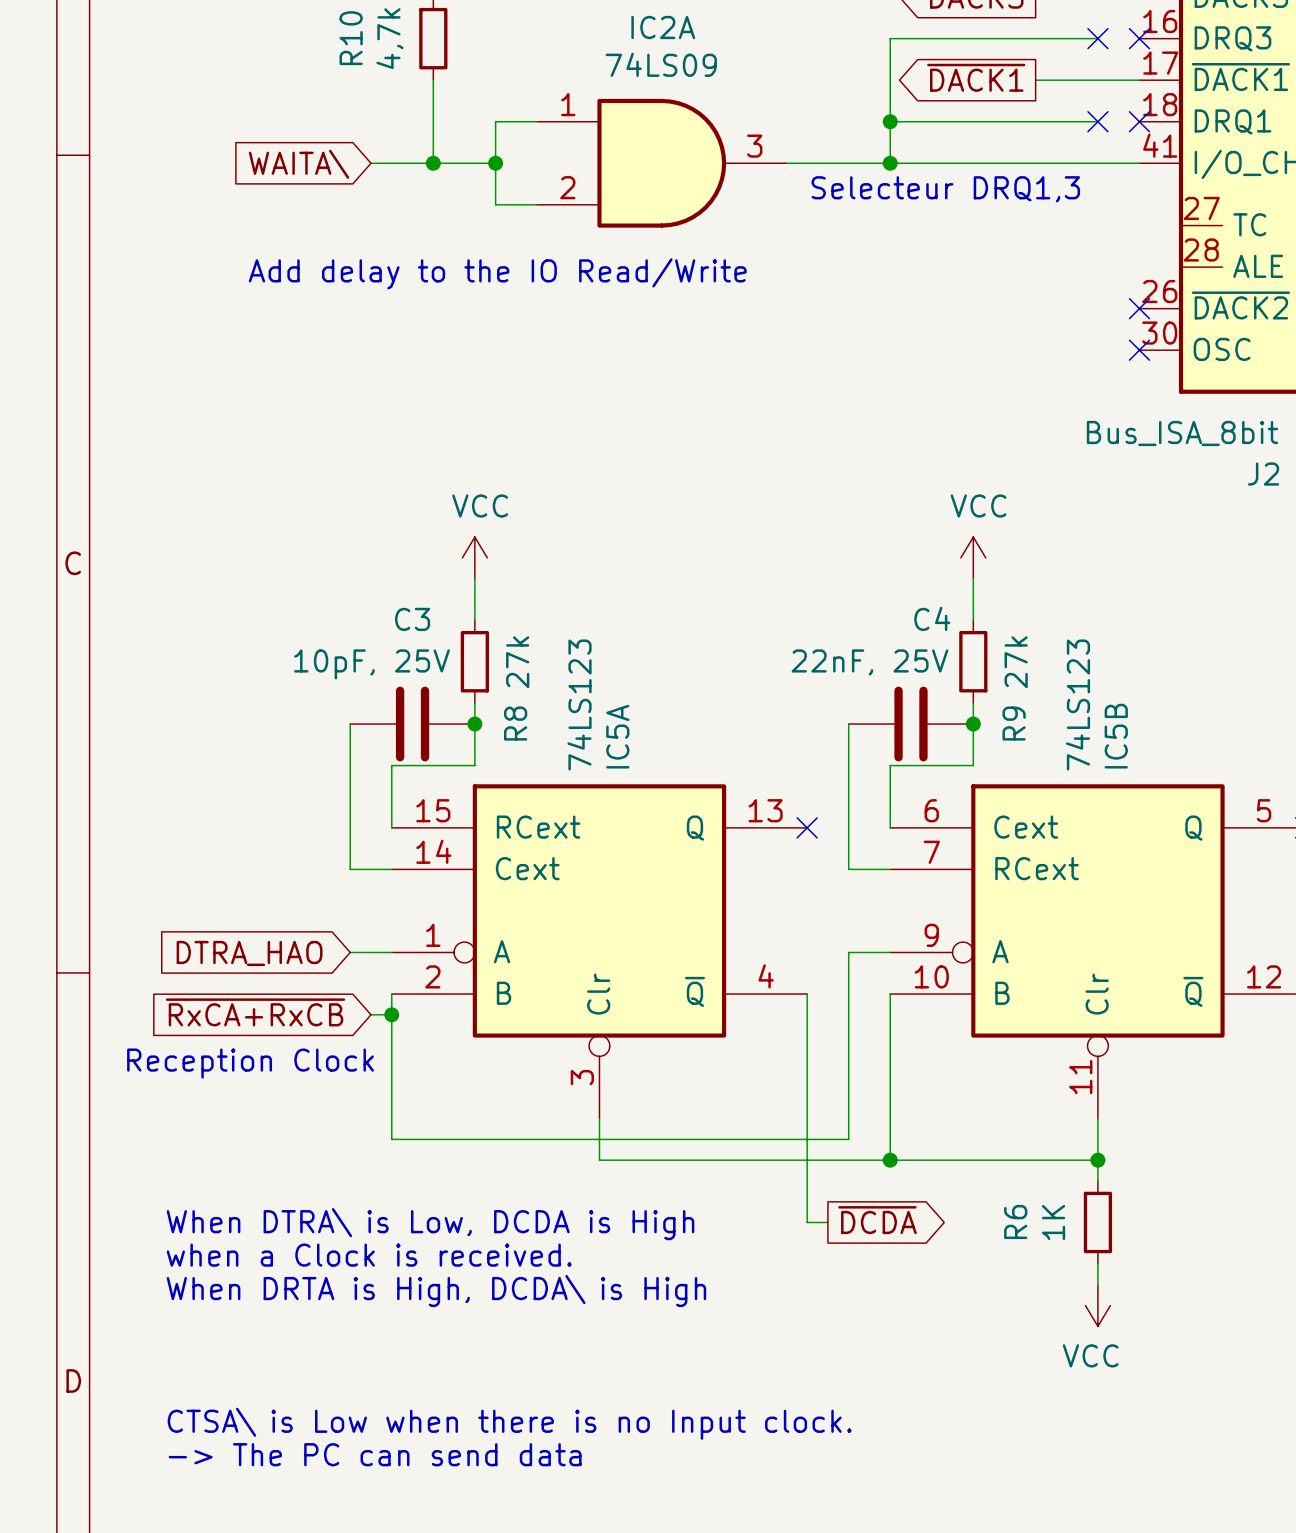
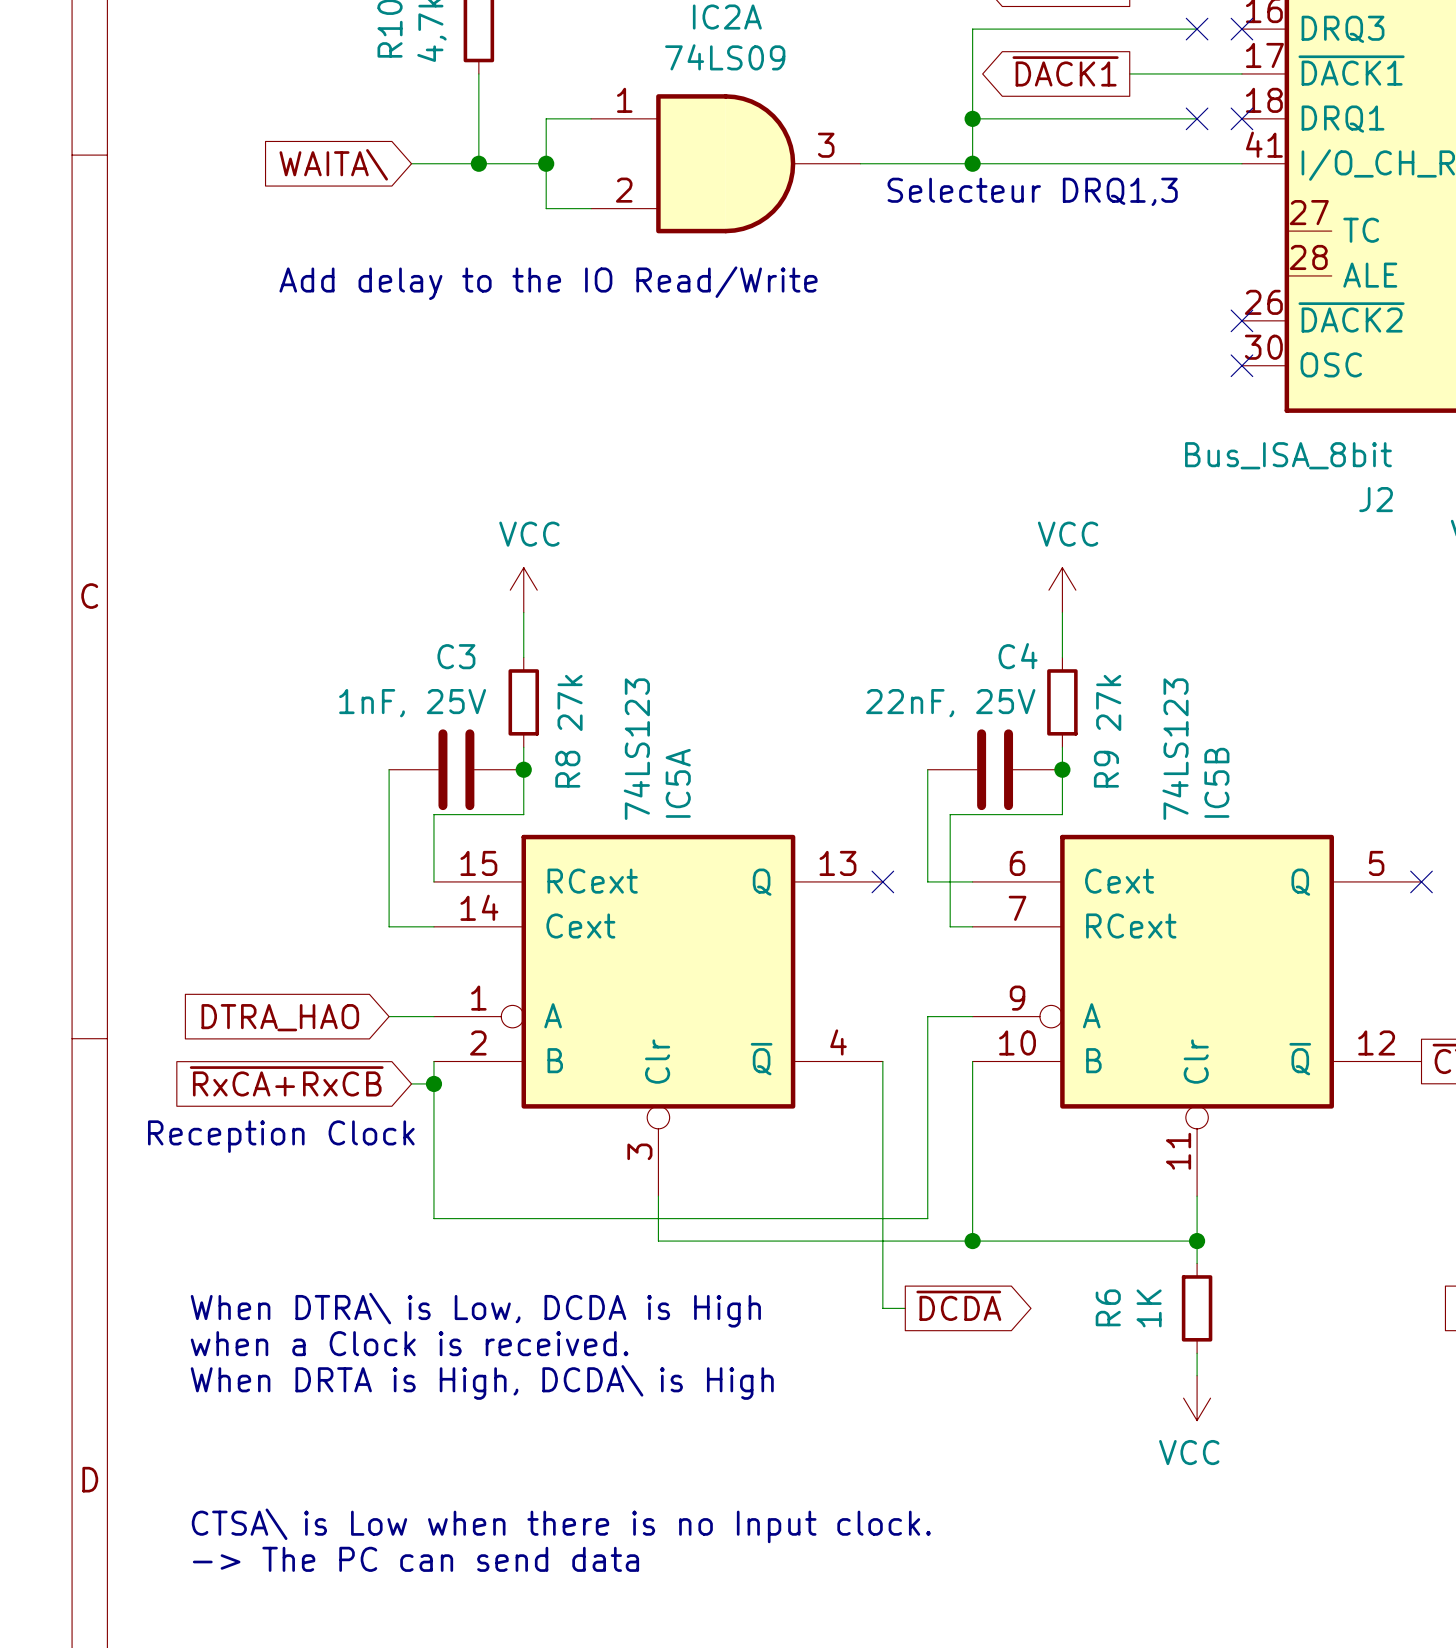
C3 value: 10pF, 25V (372, 664) -> 1nF, 25V (412, 703)
wire: (890, 765) (890, 827) -> (972, 814) (950, 814) (950, 926)
wire: (848, 827) (848, 869) (869, 869) -> (927, 881) (972, 881)

